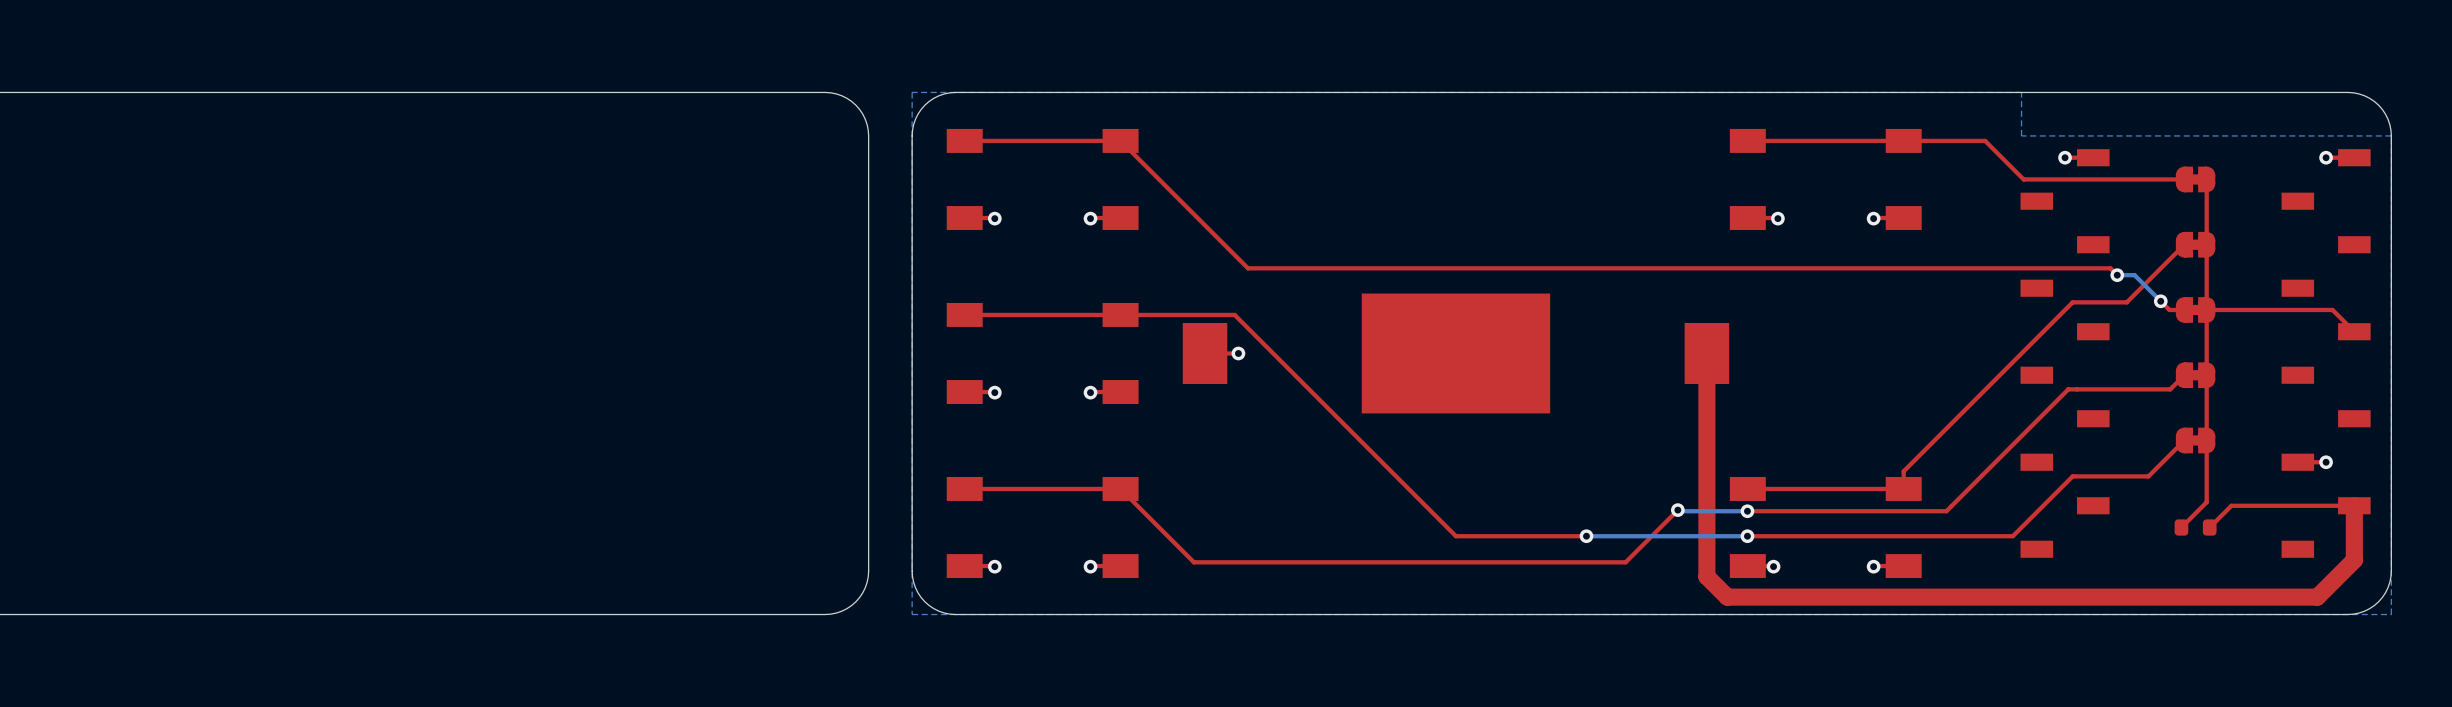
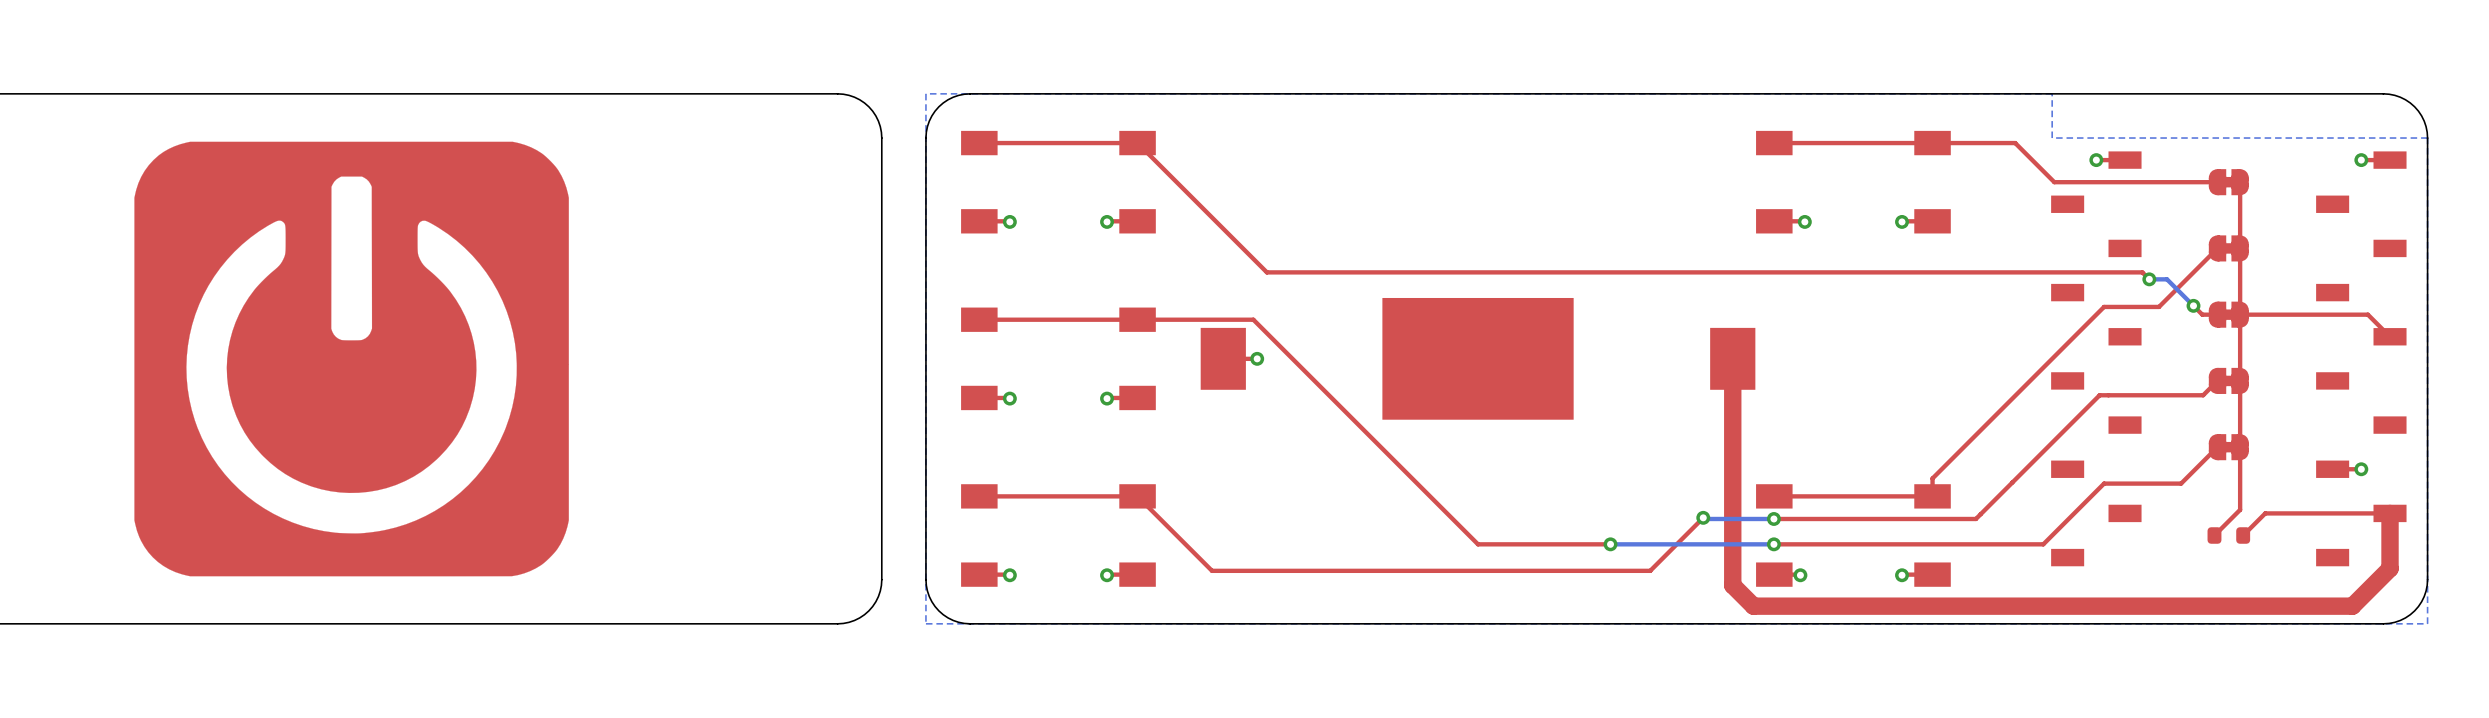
drawing: none -> [134, 141, 569, 577]

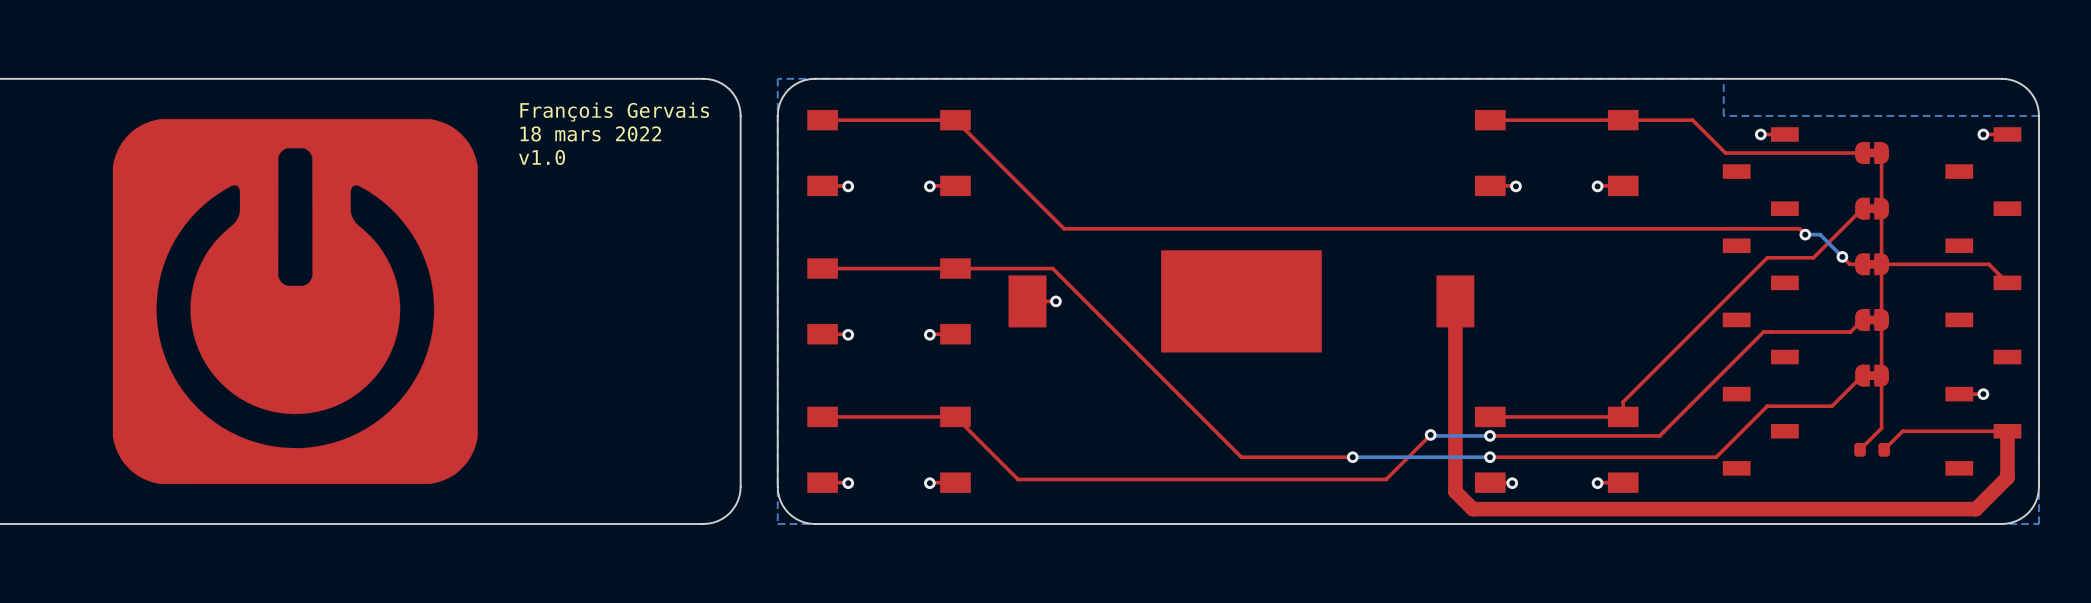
text: none -> François Gervais (614, 112)
text: none -> 18 mars 2022 (590, 133)
text: none -> v1.0 (542, 157)

